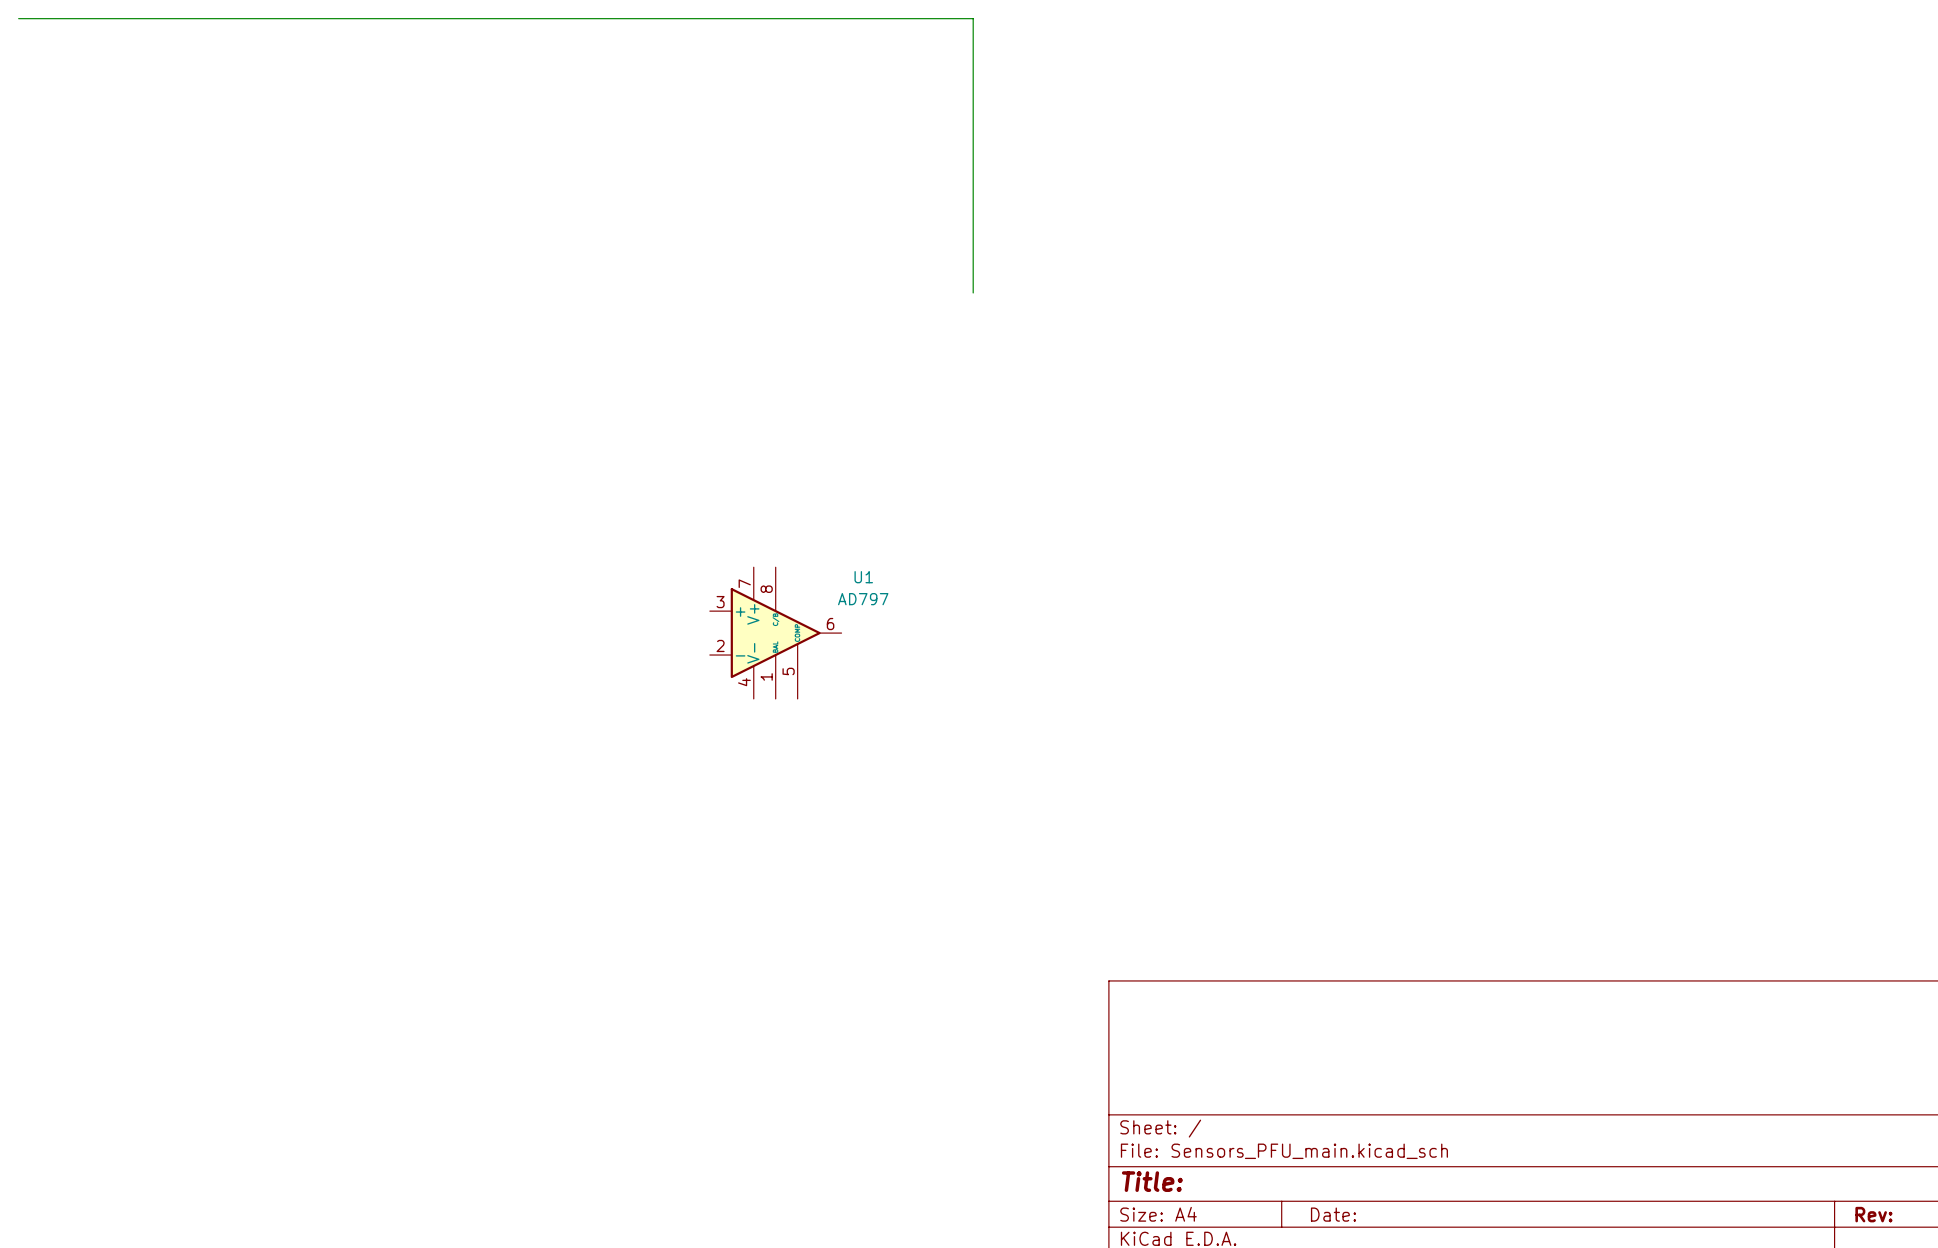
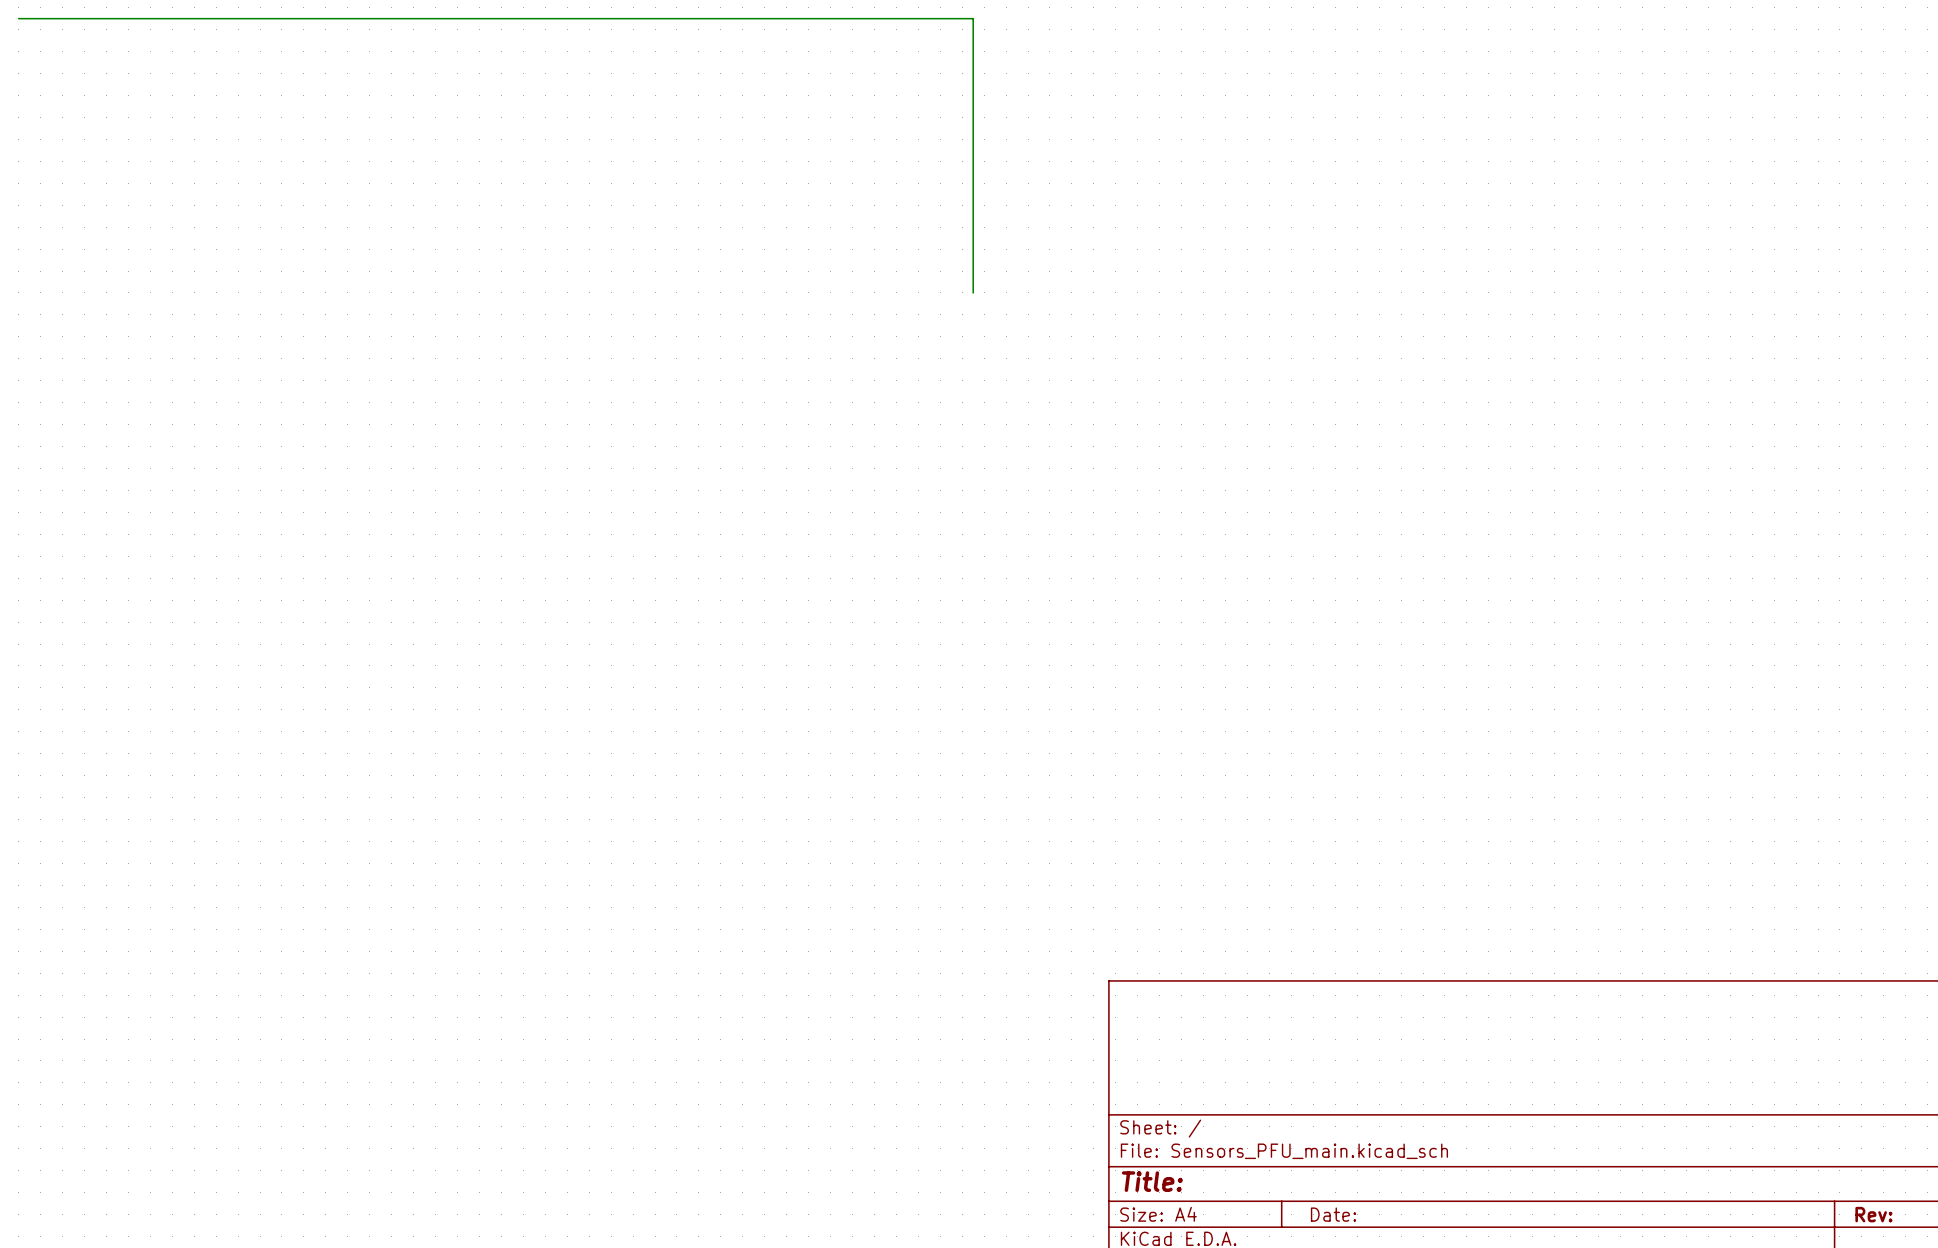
U1: AD797 (775, 633) -> none

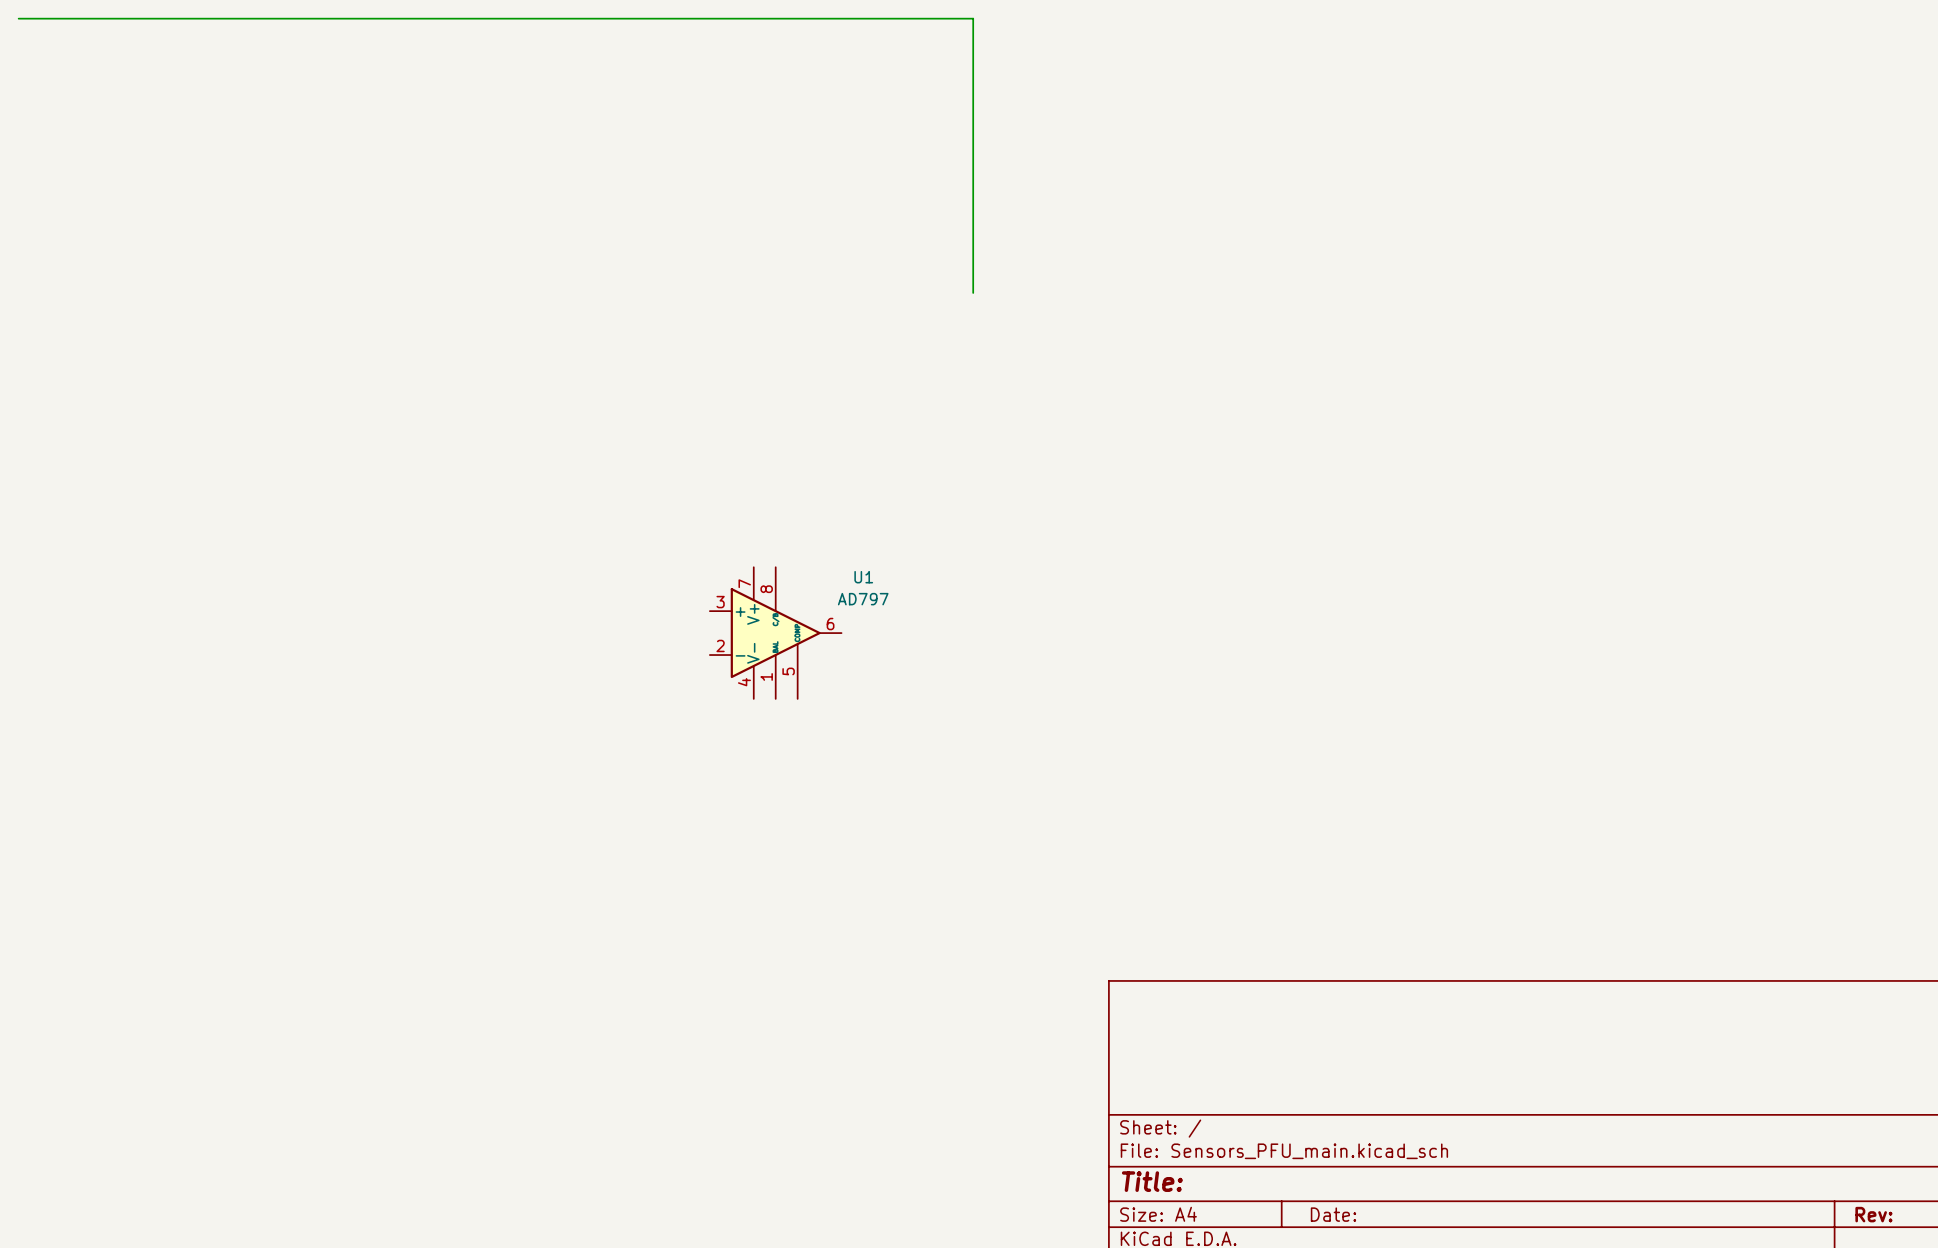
U1: none -> AD797 (775, 633)

